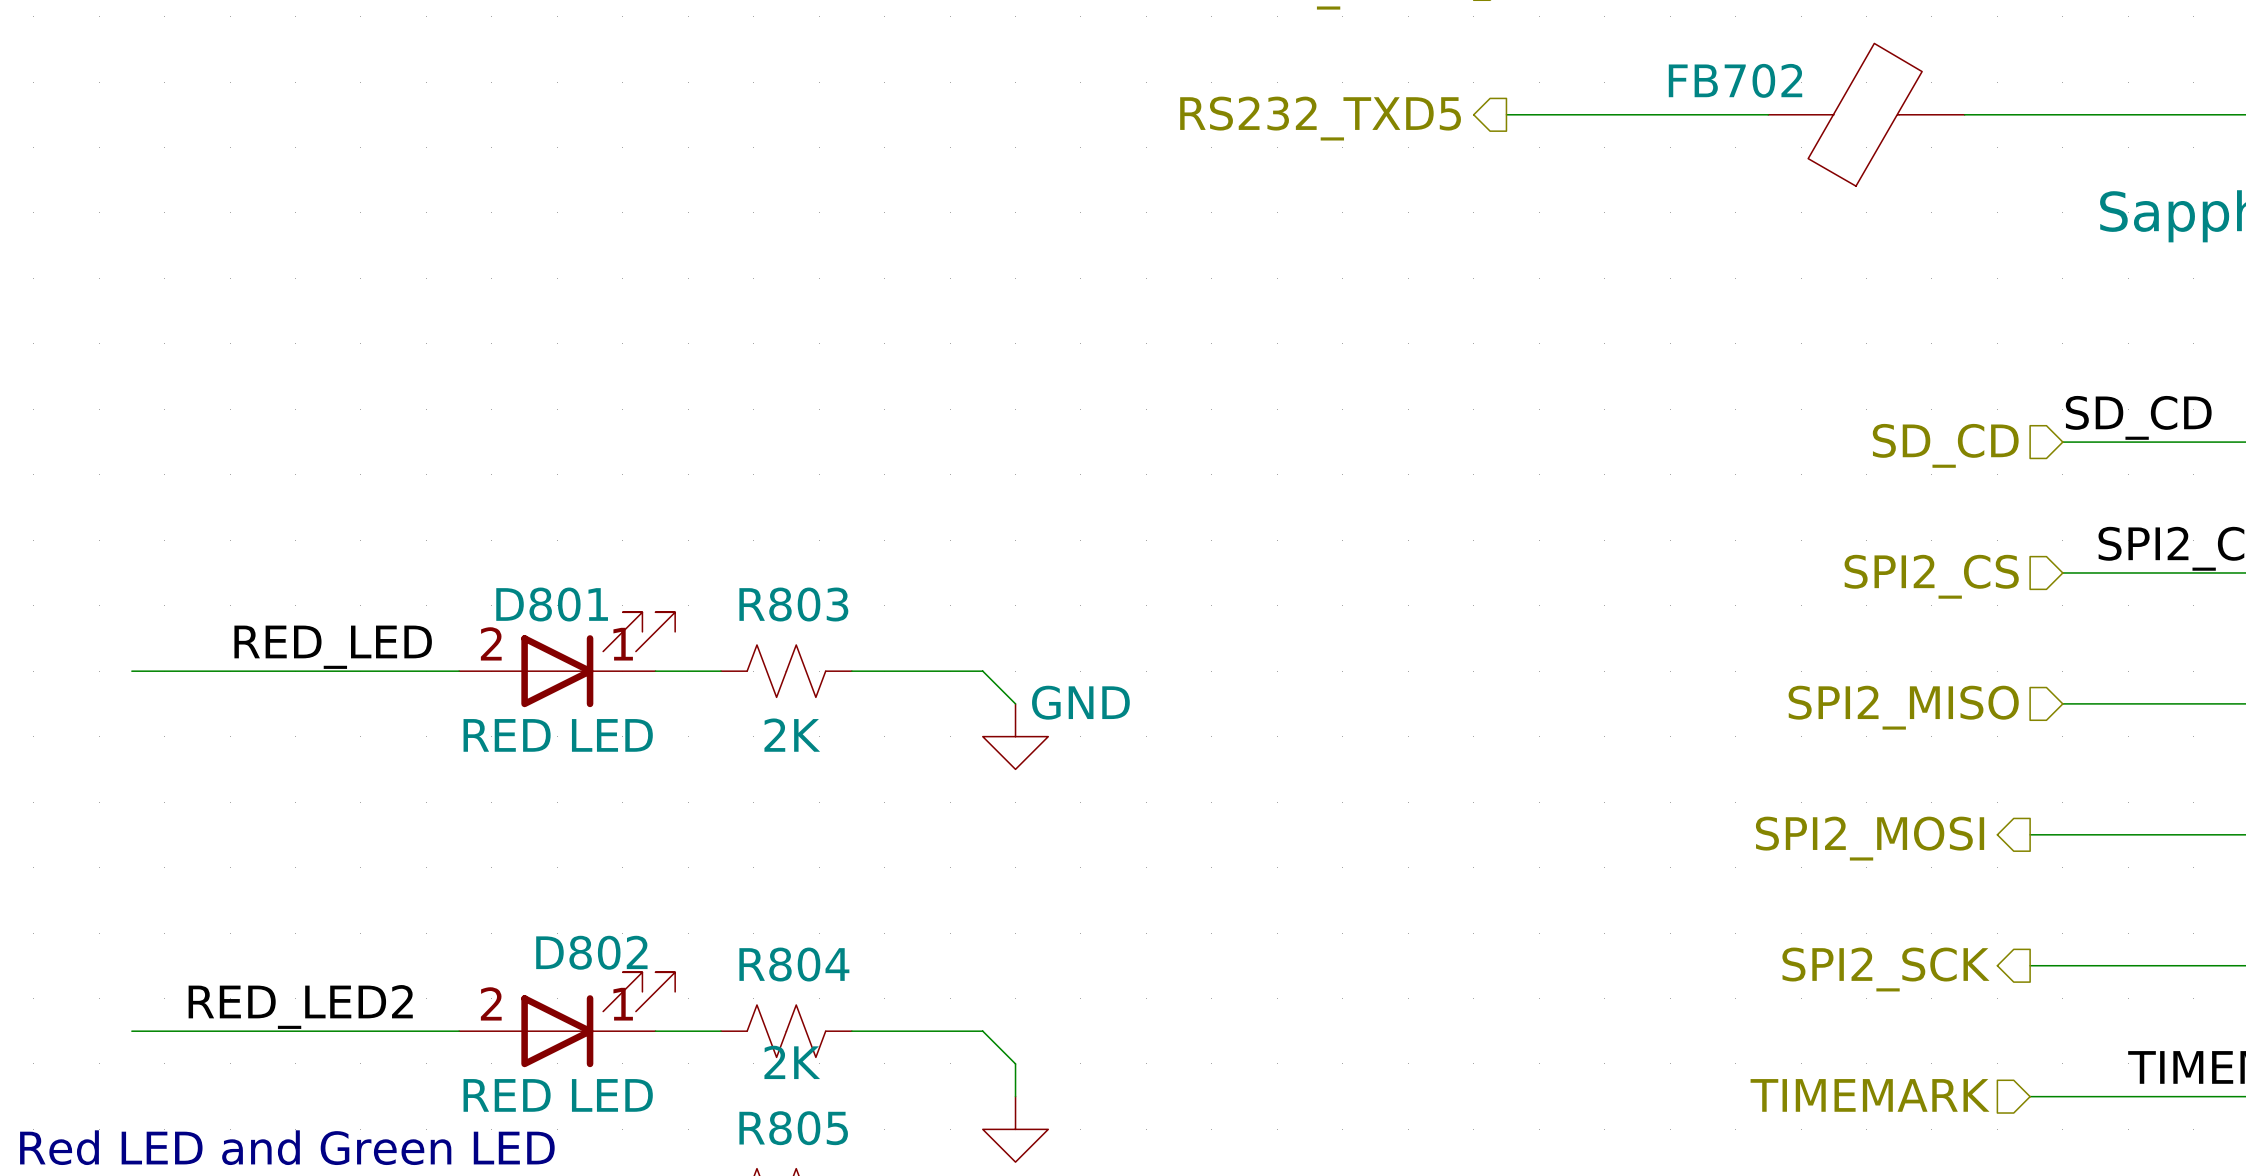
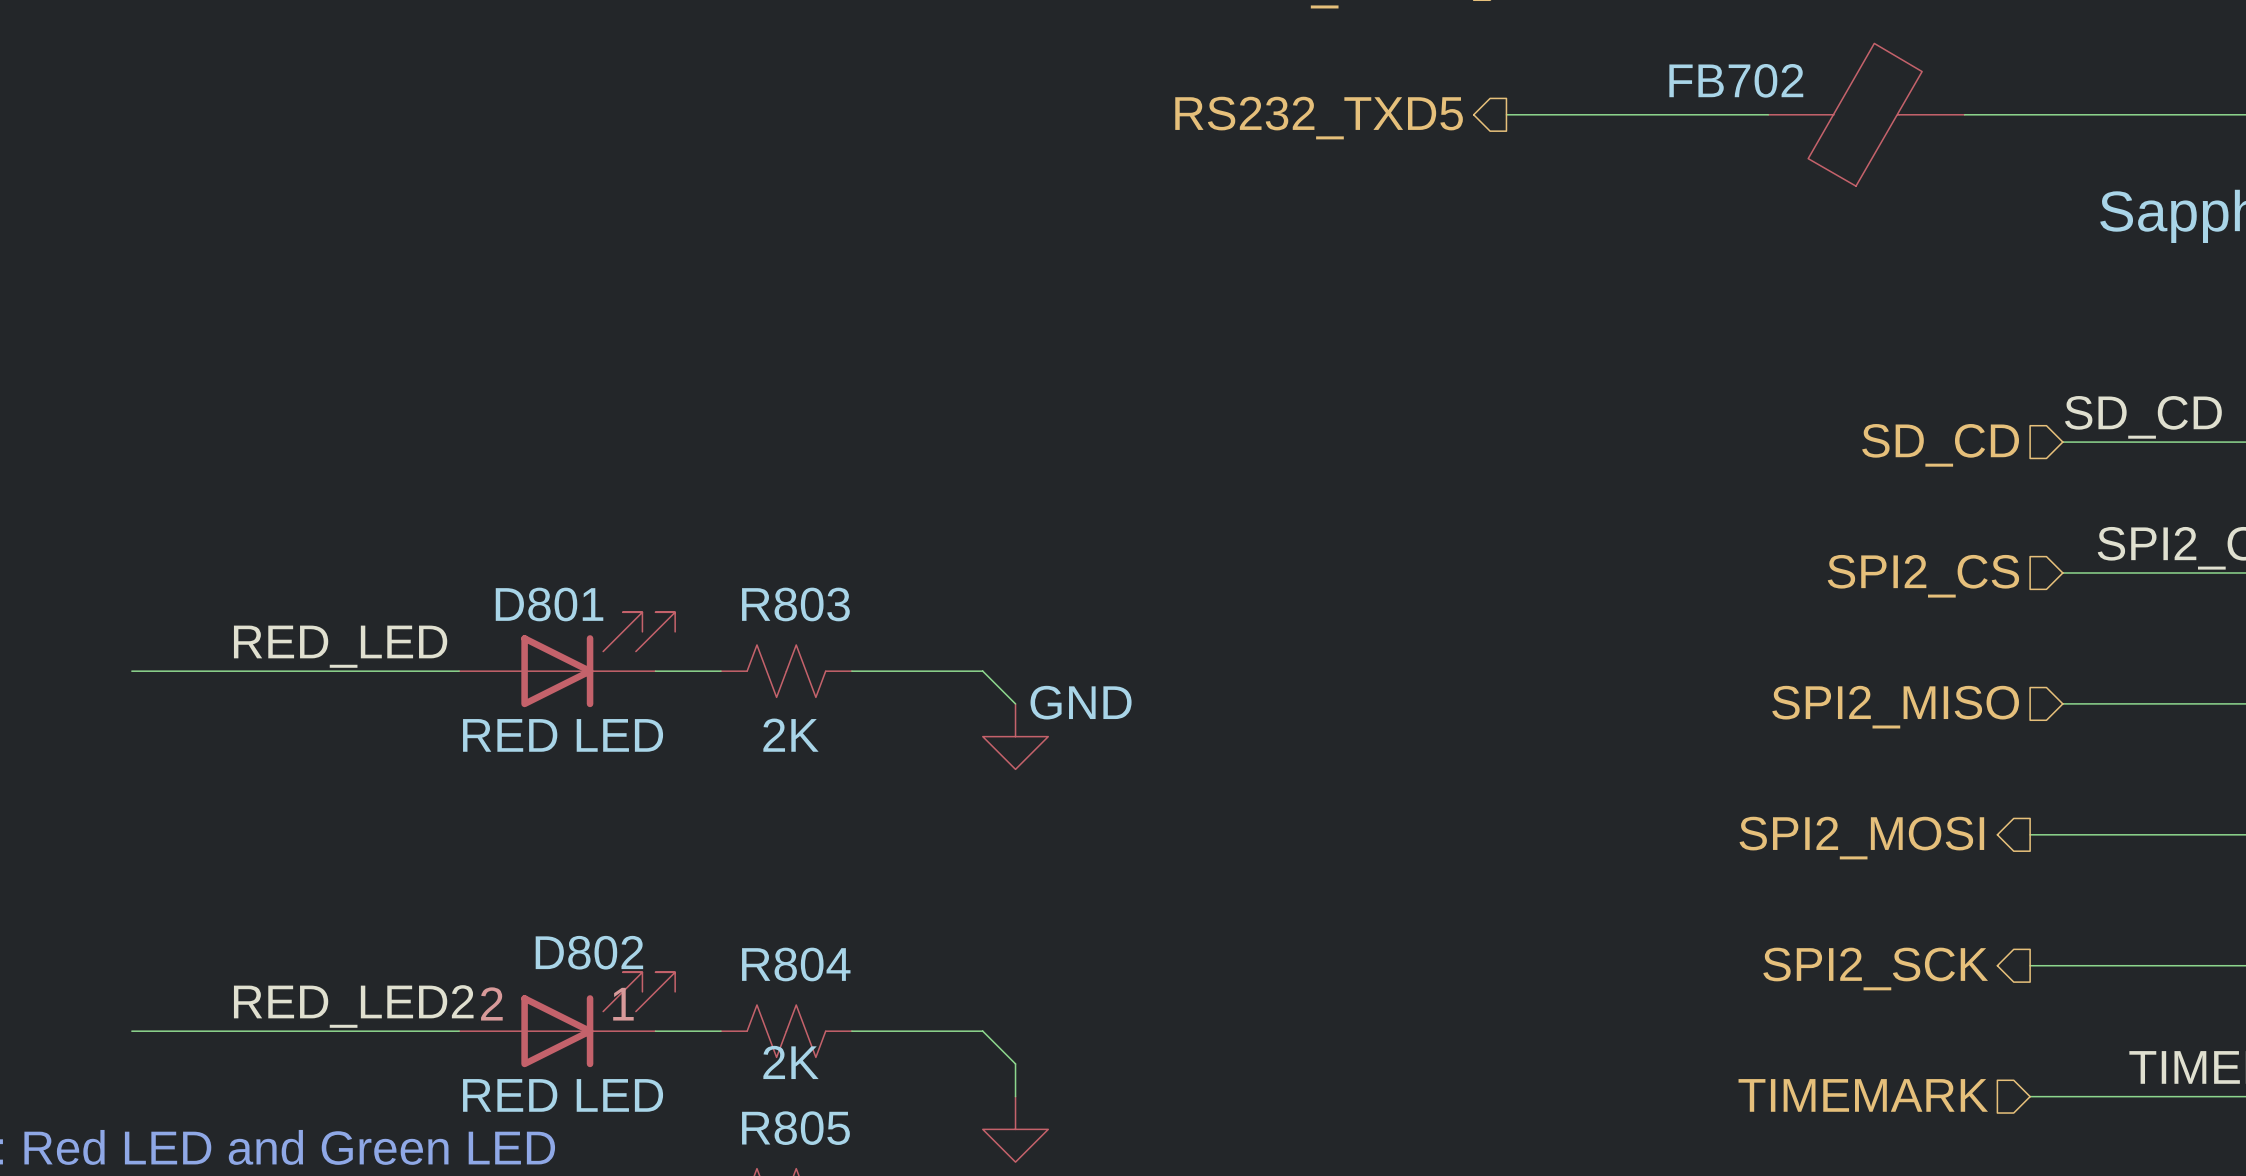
D801 pin number: 2 (491, 643) -> none
D801 pin number: 1 (623, 644) -> none
label position: RED_LED2 (300, 1006) -> RED_LED2 (353, 1006)

